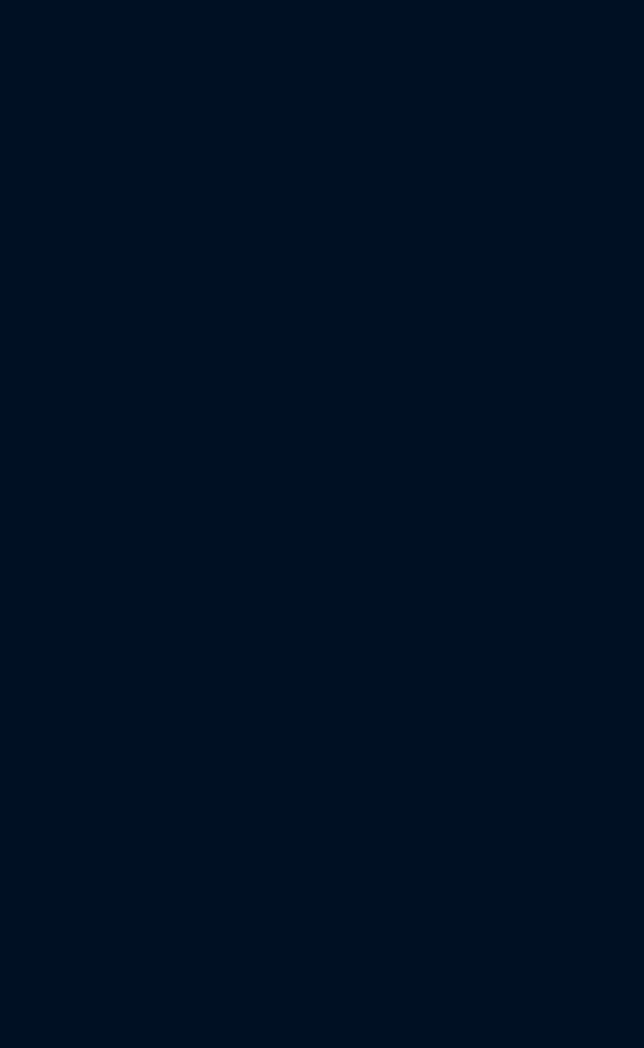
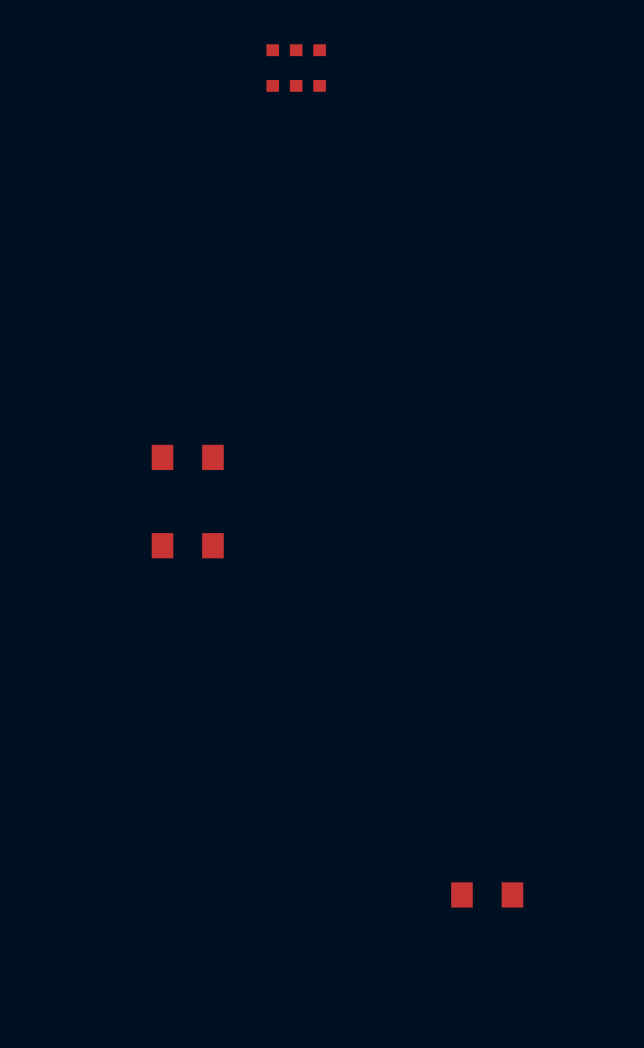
part: none -> (296, 68)
part: none -> (187, 457)
part: none -> (187, 545)
part: none -> (487, 894)

